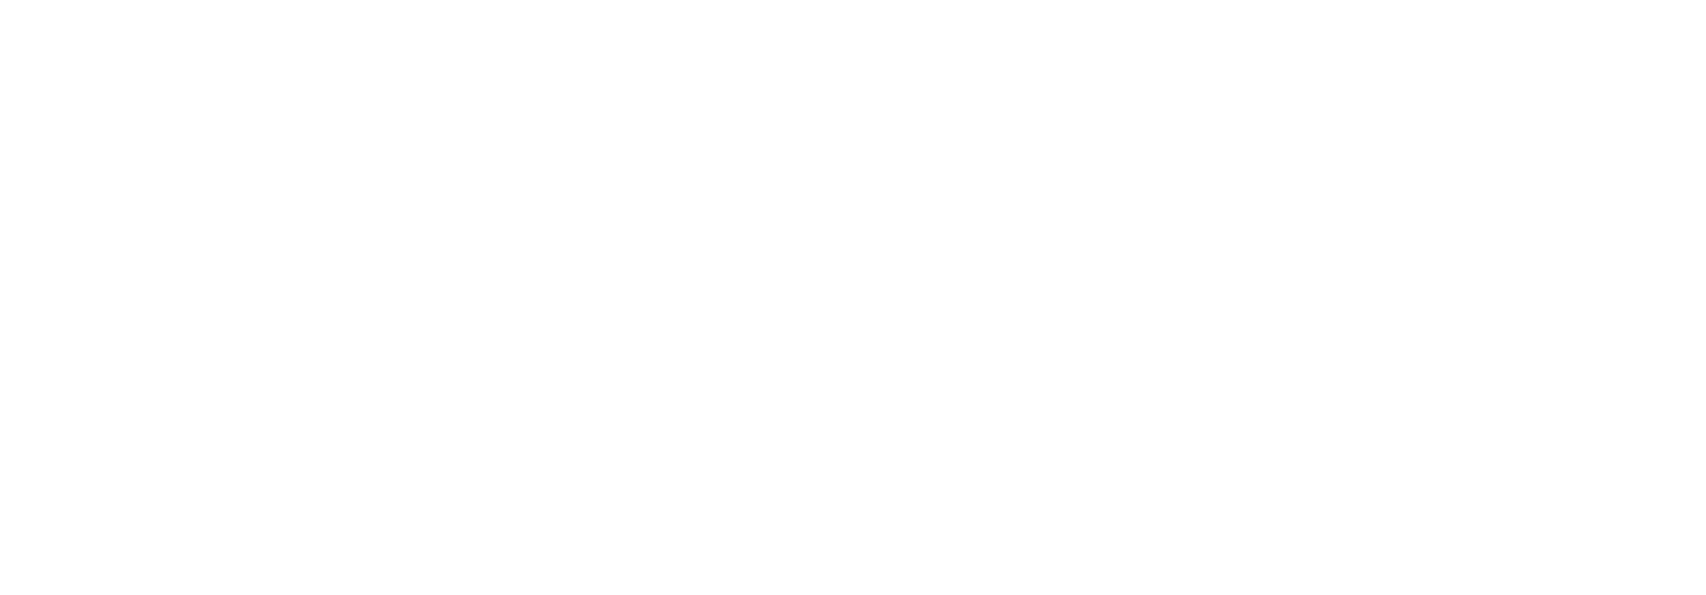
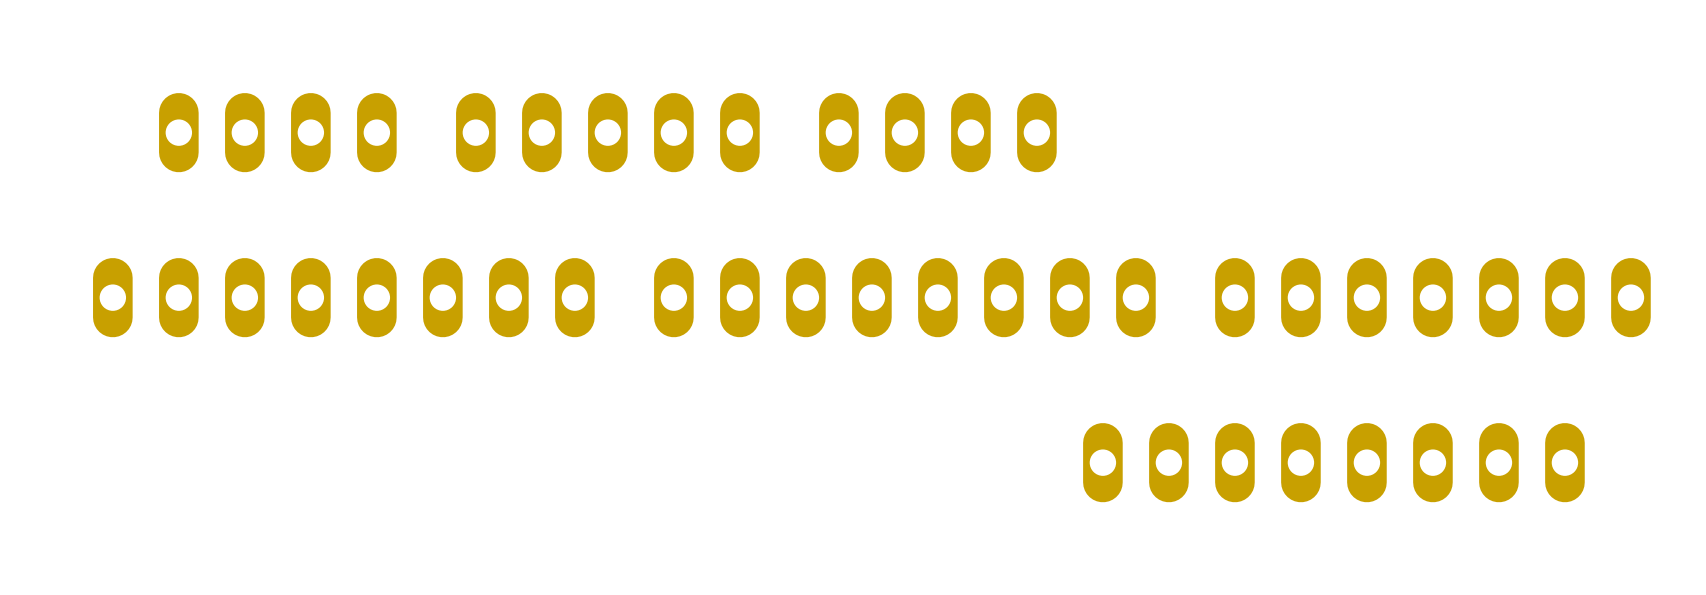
part: none -> (277, 132)
part: none -> (607, 132)
part: none -> (937, 132)
part: none -> (343, 297)
part: none -> (904, 297)
part: none -> (1432, 297)
part: none -> (1333, 462)

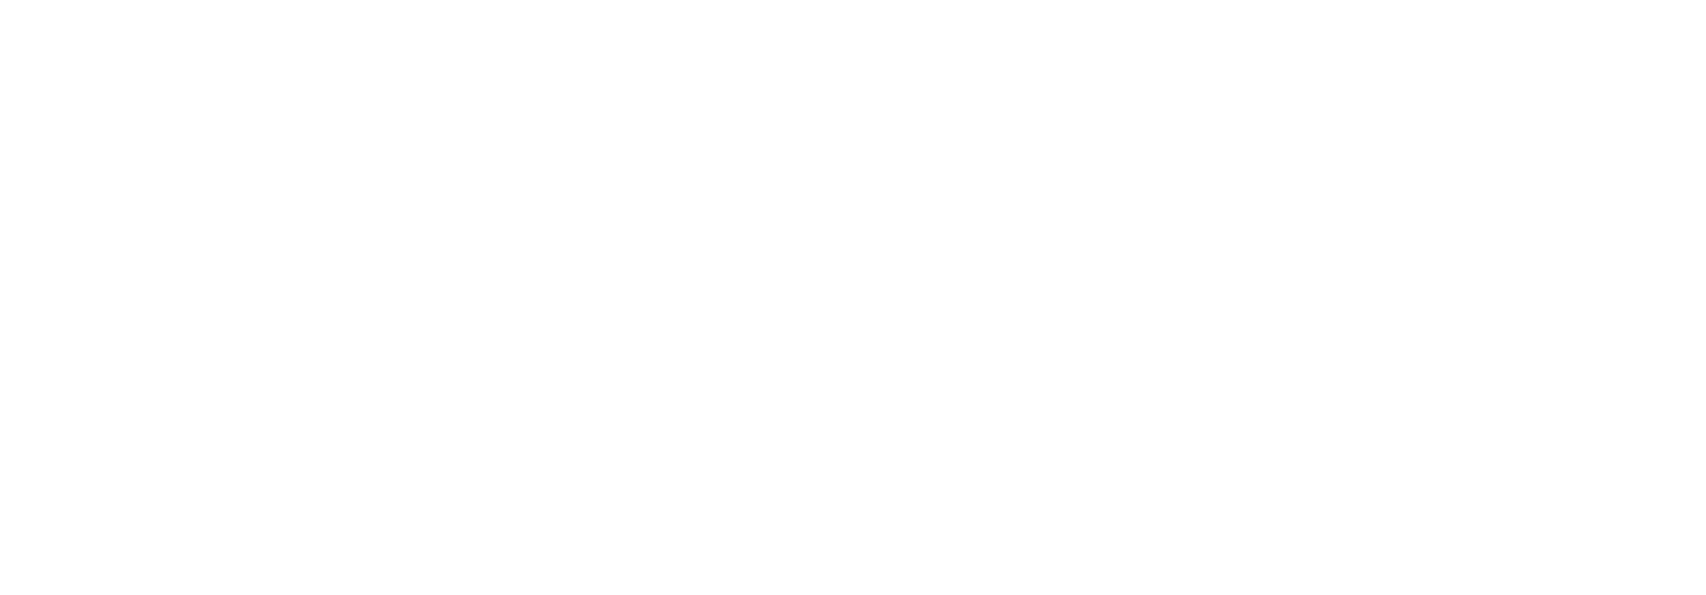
part: (277, 132) -> none
part: (607, 132) -> none
part: (937, 132) -> none
part: (343, 297) -> none
part: (904, 297) -> none
part: (1432, 297) -> none
part: (1333, 462) -> none

